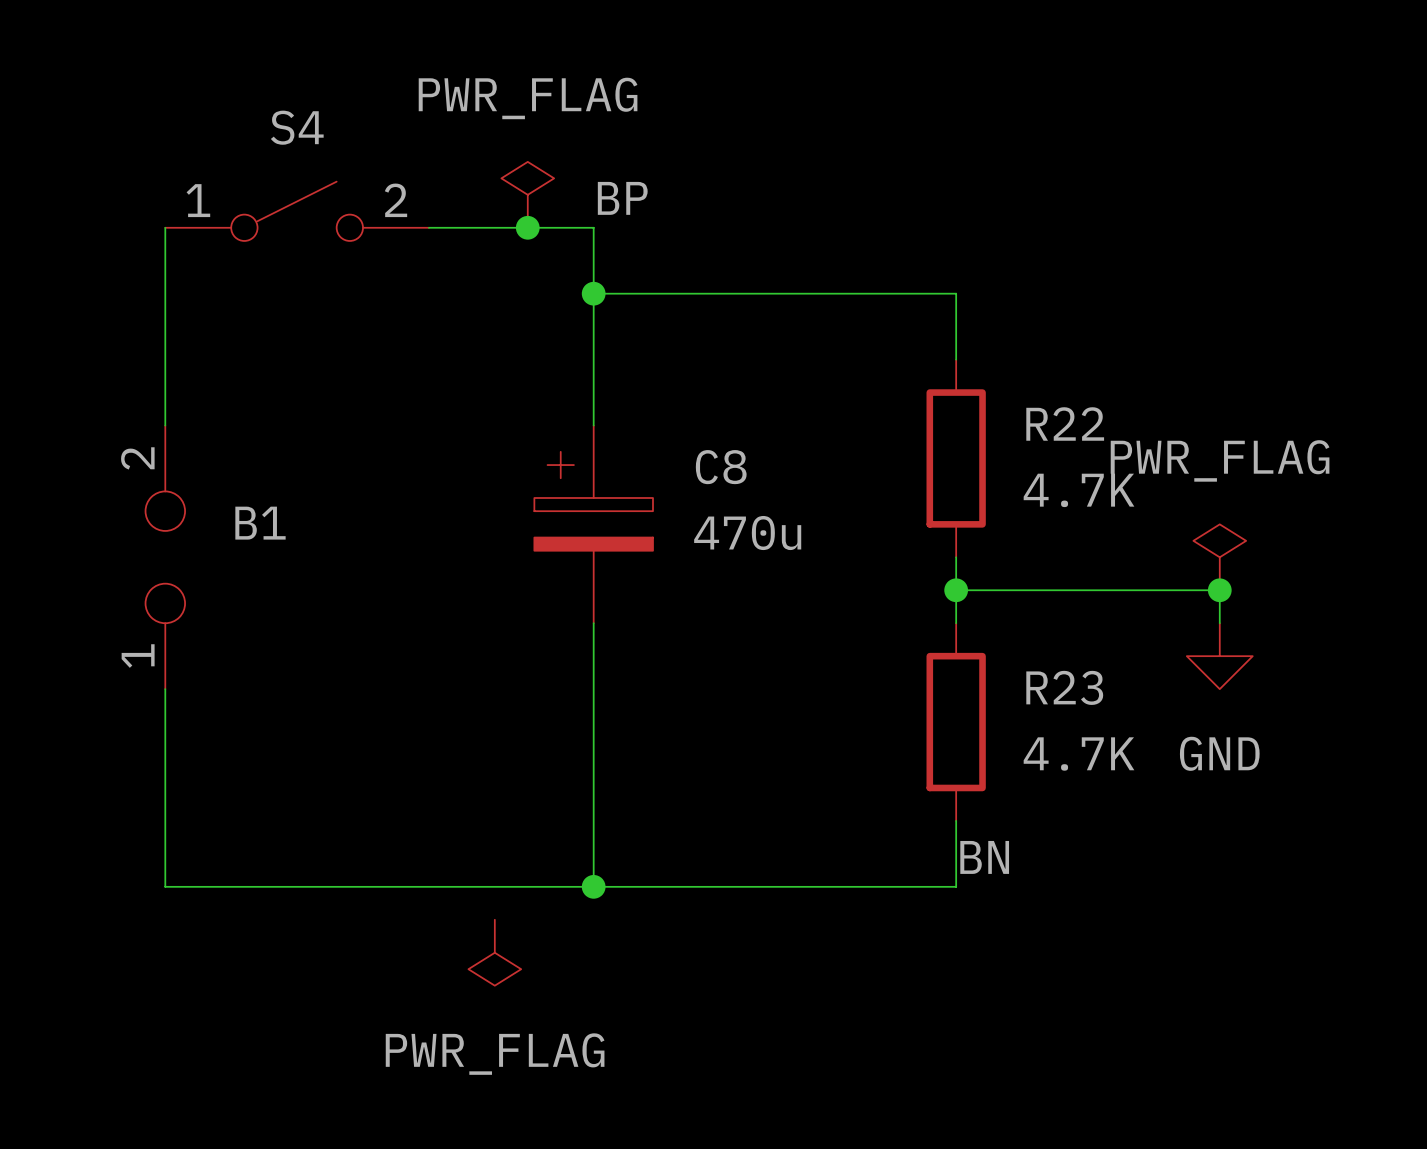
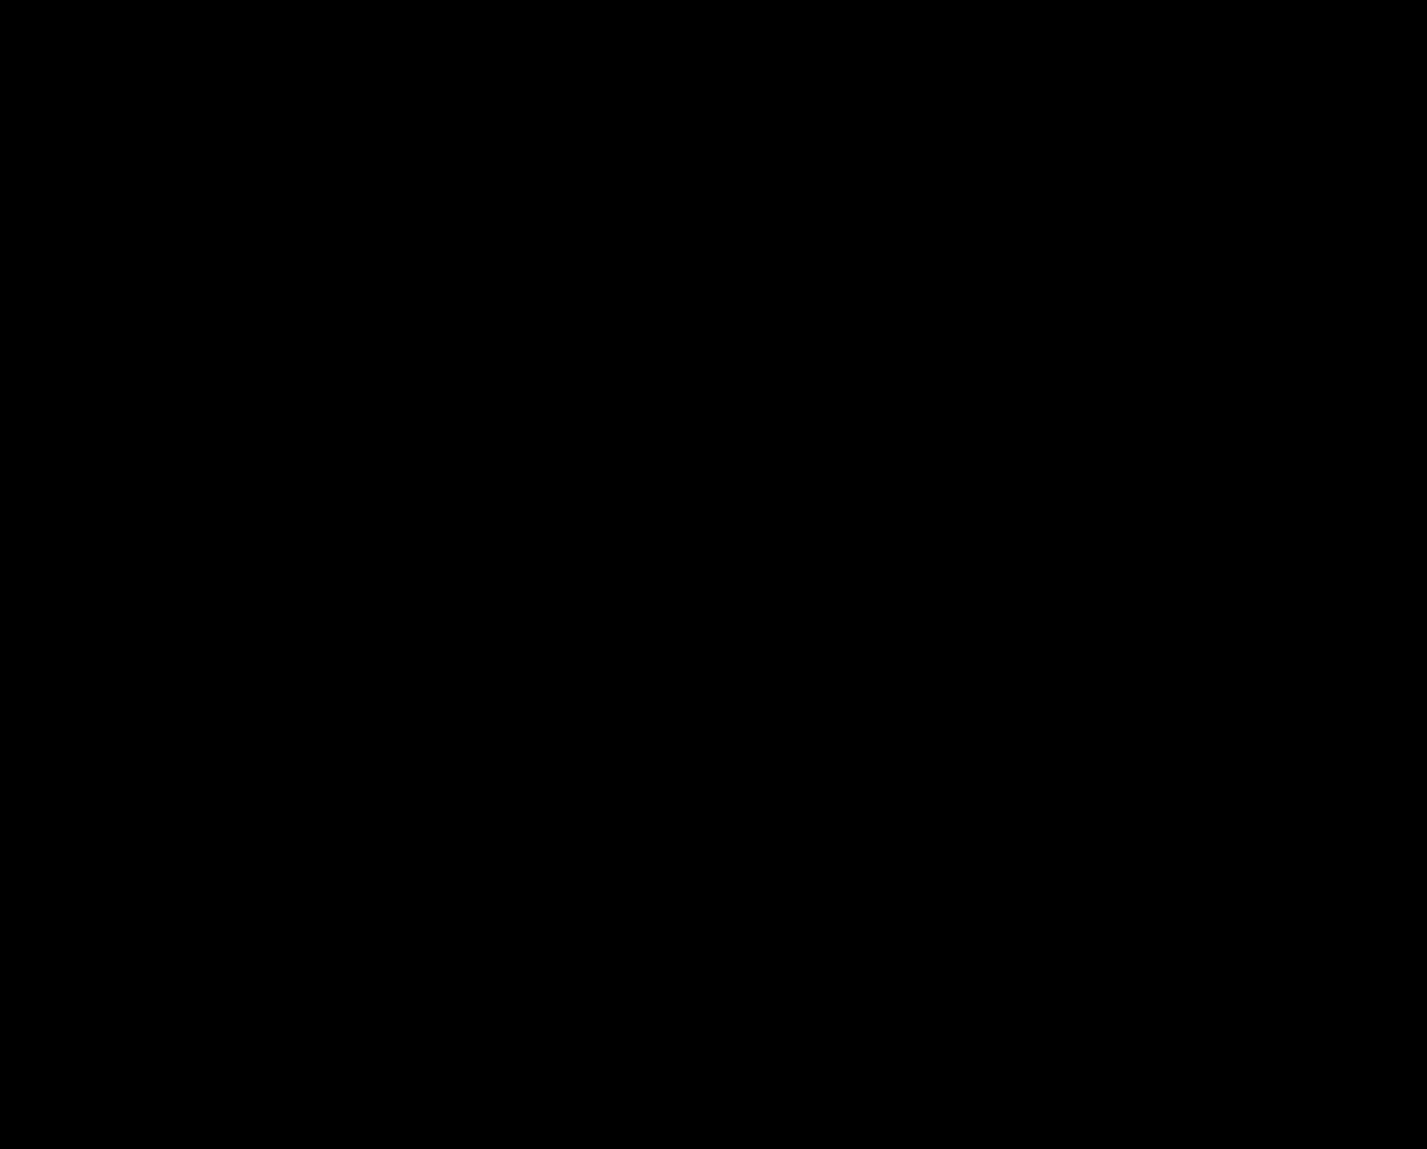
power symbol: PWR_FLAG (527, 194) -> none
label: BP (622, 198) -> none
part: S4 (297, 211) -> none
wire: (165, 227) (165, 425) -> none
wire: (428, 227) (593, 227) (593, 425) -> none
junction: (527, 227) -> none
wire: (593, 293) (956, 293) (956, 359) -> none
junction: (593, 293) -> none
R22: 4.7K (956, 458) -> none
C8: 470u (593, 524) -> none
B1: (165, 557) -> none
wire: (956, 557) (956, 623) -> none
power symbol: PWR_FLAG (1219, 557) -> none
wire: (956, 590) (1219, 590) (1219, 623) -> none
junction: (956, 590) -> none
junction: (1219, 590) -> none
wire: (593, 623) (593, 886) -> none
power symbol: GND (1219, 656) -> none
wire: (165, 689) (165, 886) (956, 886) (956, 820) -> none
R23: 4.7K (956, 722) -> none
label: BN (984, 857) -> none
junction: (593, 886) -> none
power symbol: PWR_FLAG (494, 952) -> none

